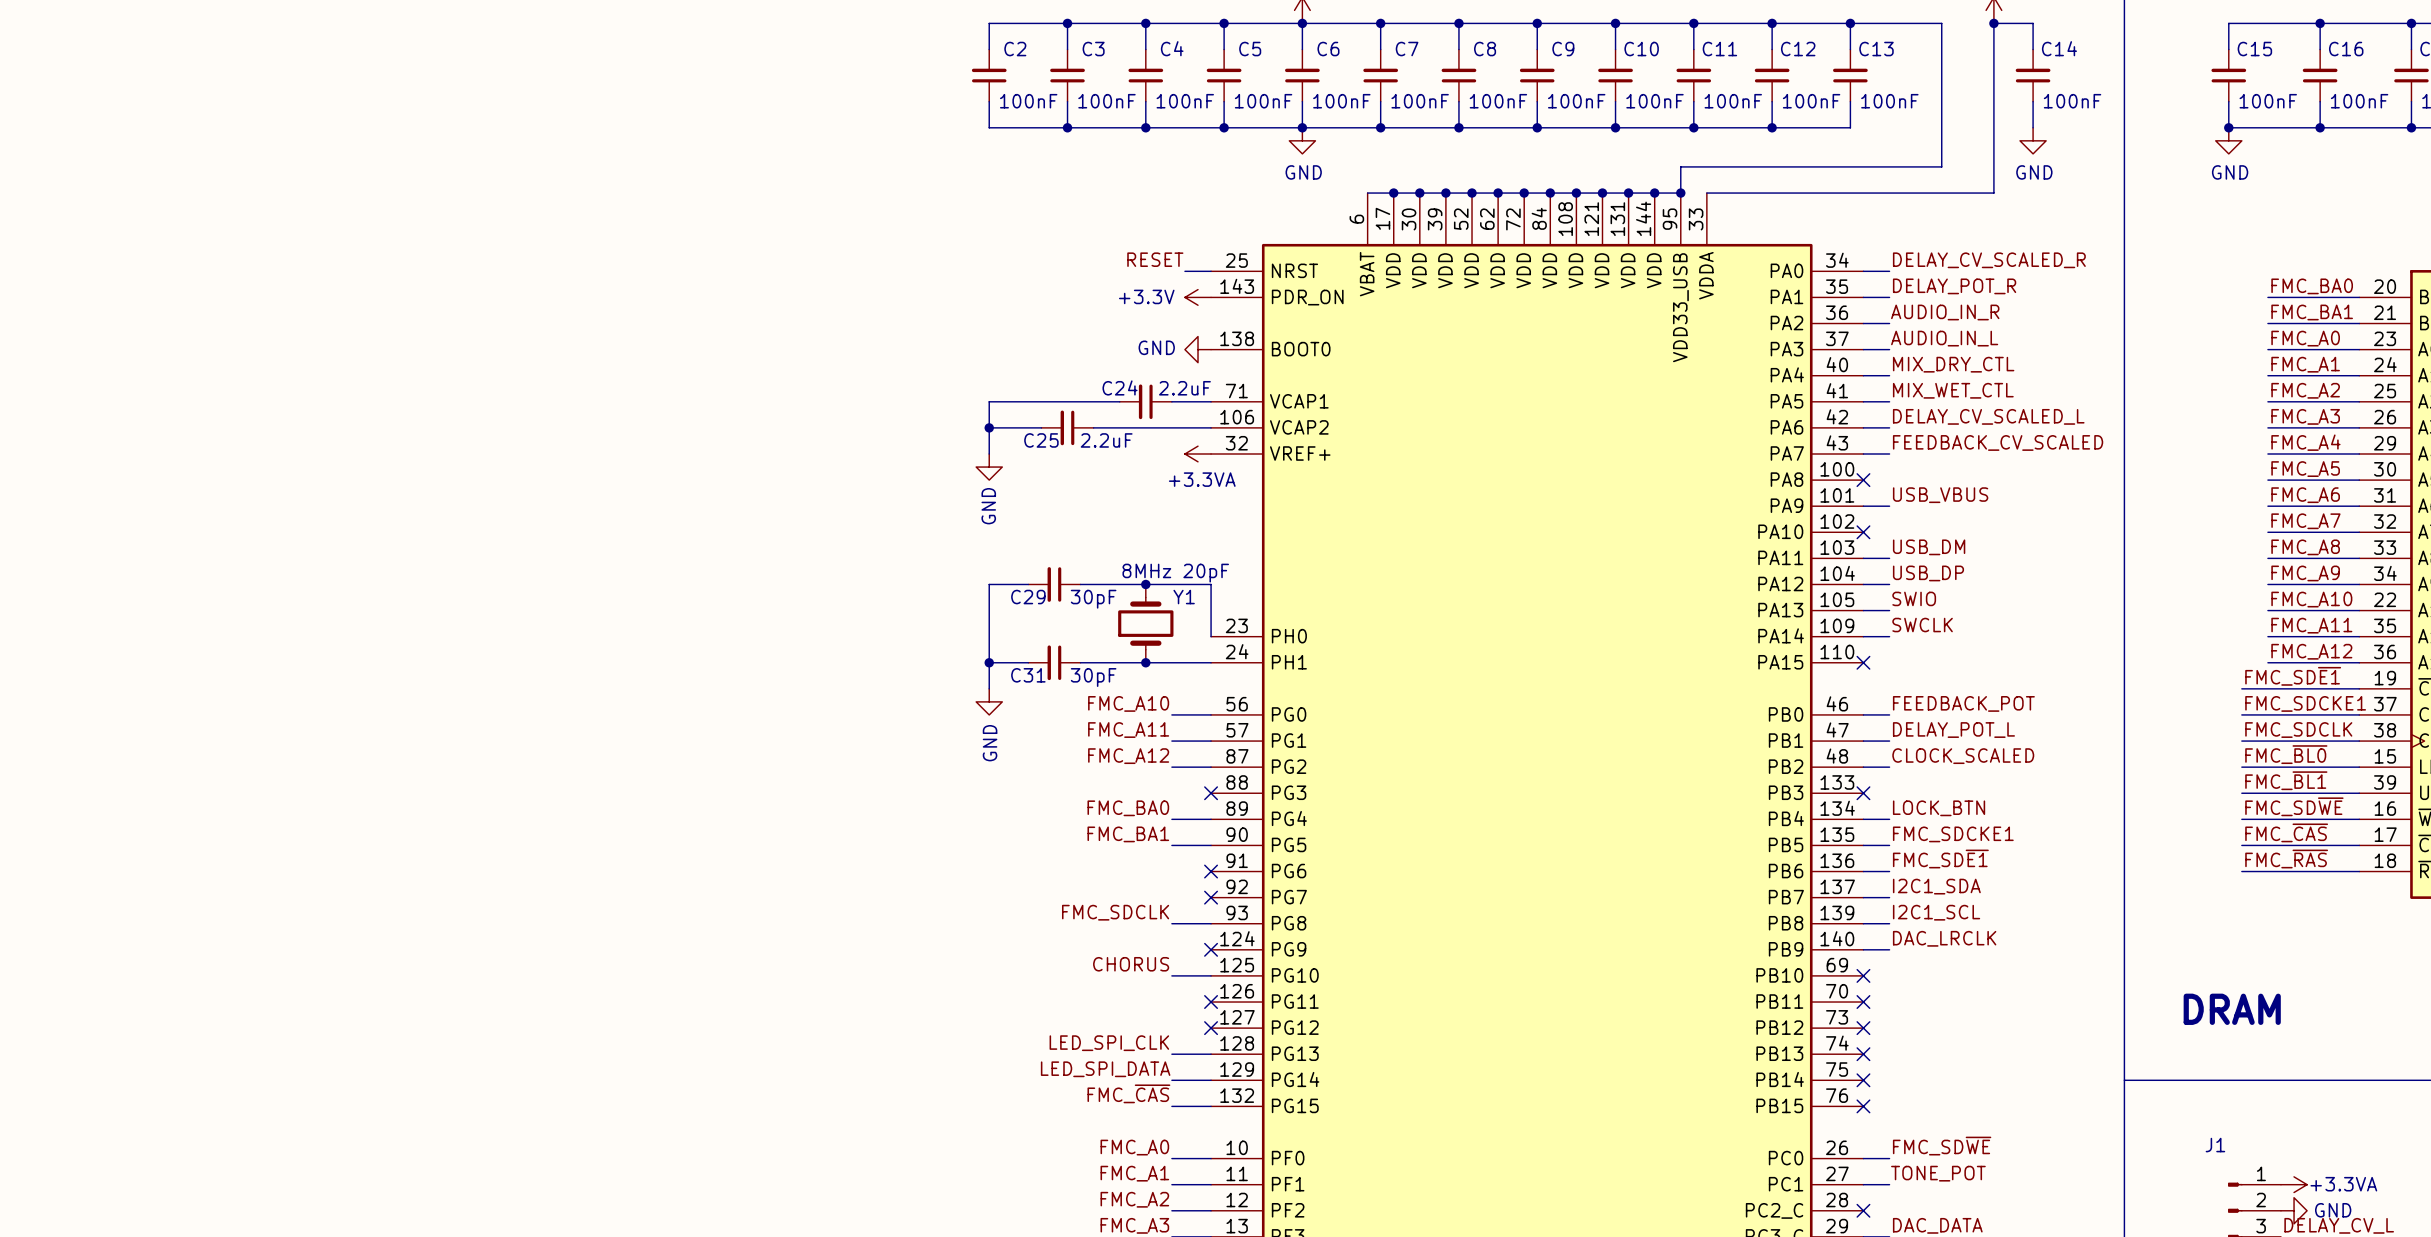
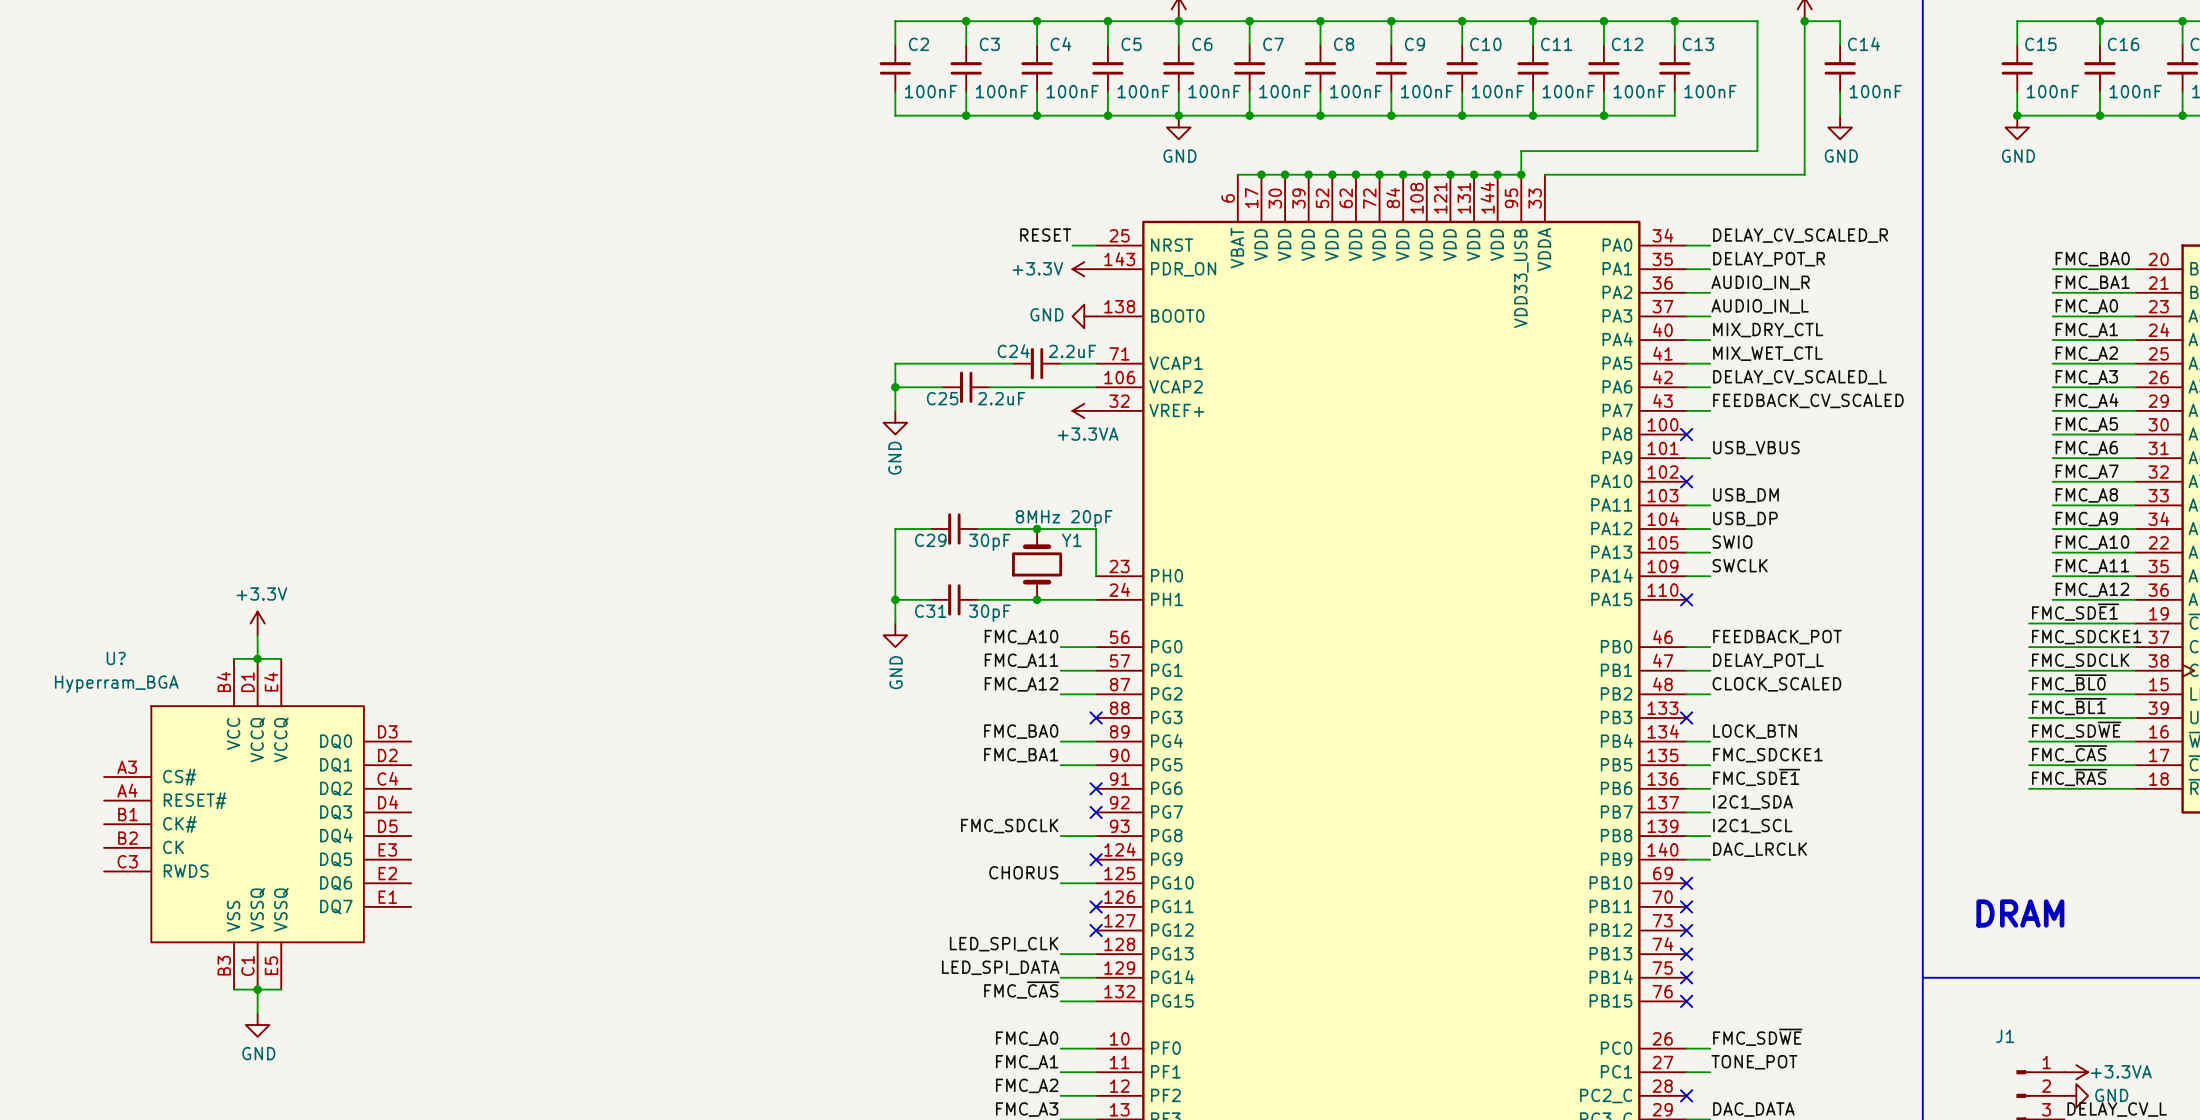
power symbol: none -> +3.3V (257, 623)
wire: none -> (257, 635) (257, 658)
wire: none -> (234, 658) (281, 658)
junction: none -> (257, 658)
U?: none -> Hyperram_BGA (257, 824)
wire: none -> (234, 989) (281, 989)
wire: none -> (257, 989) (257, 1013)
junction: none -> (257, 989)
power symbol: none -> GND (257, 1025)

